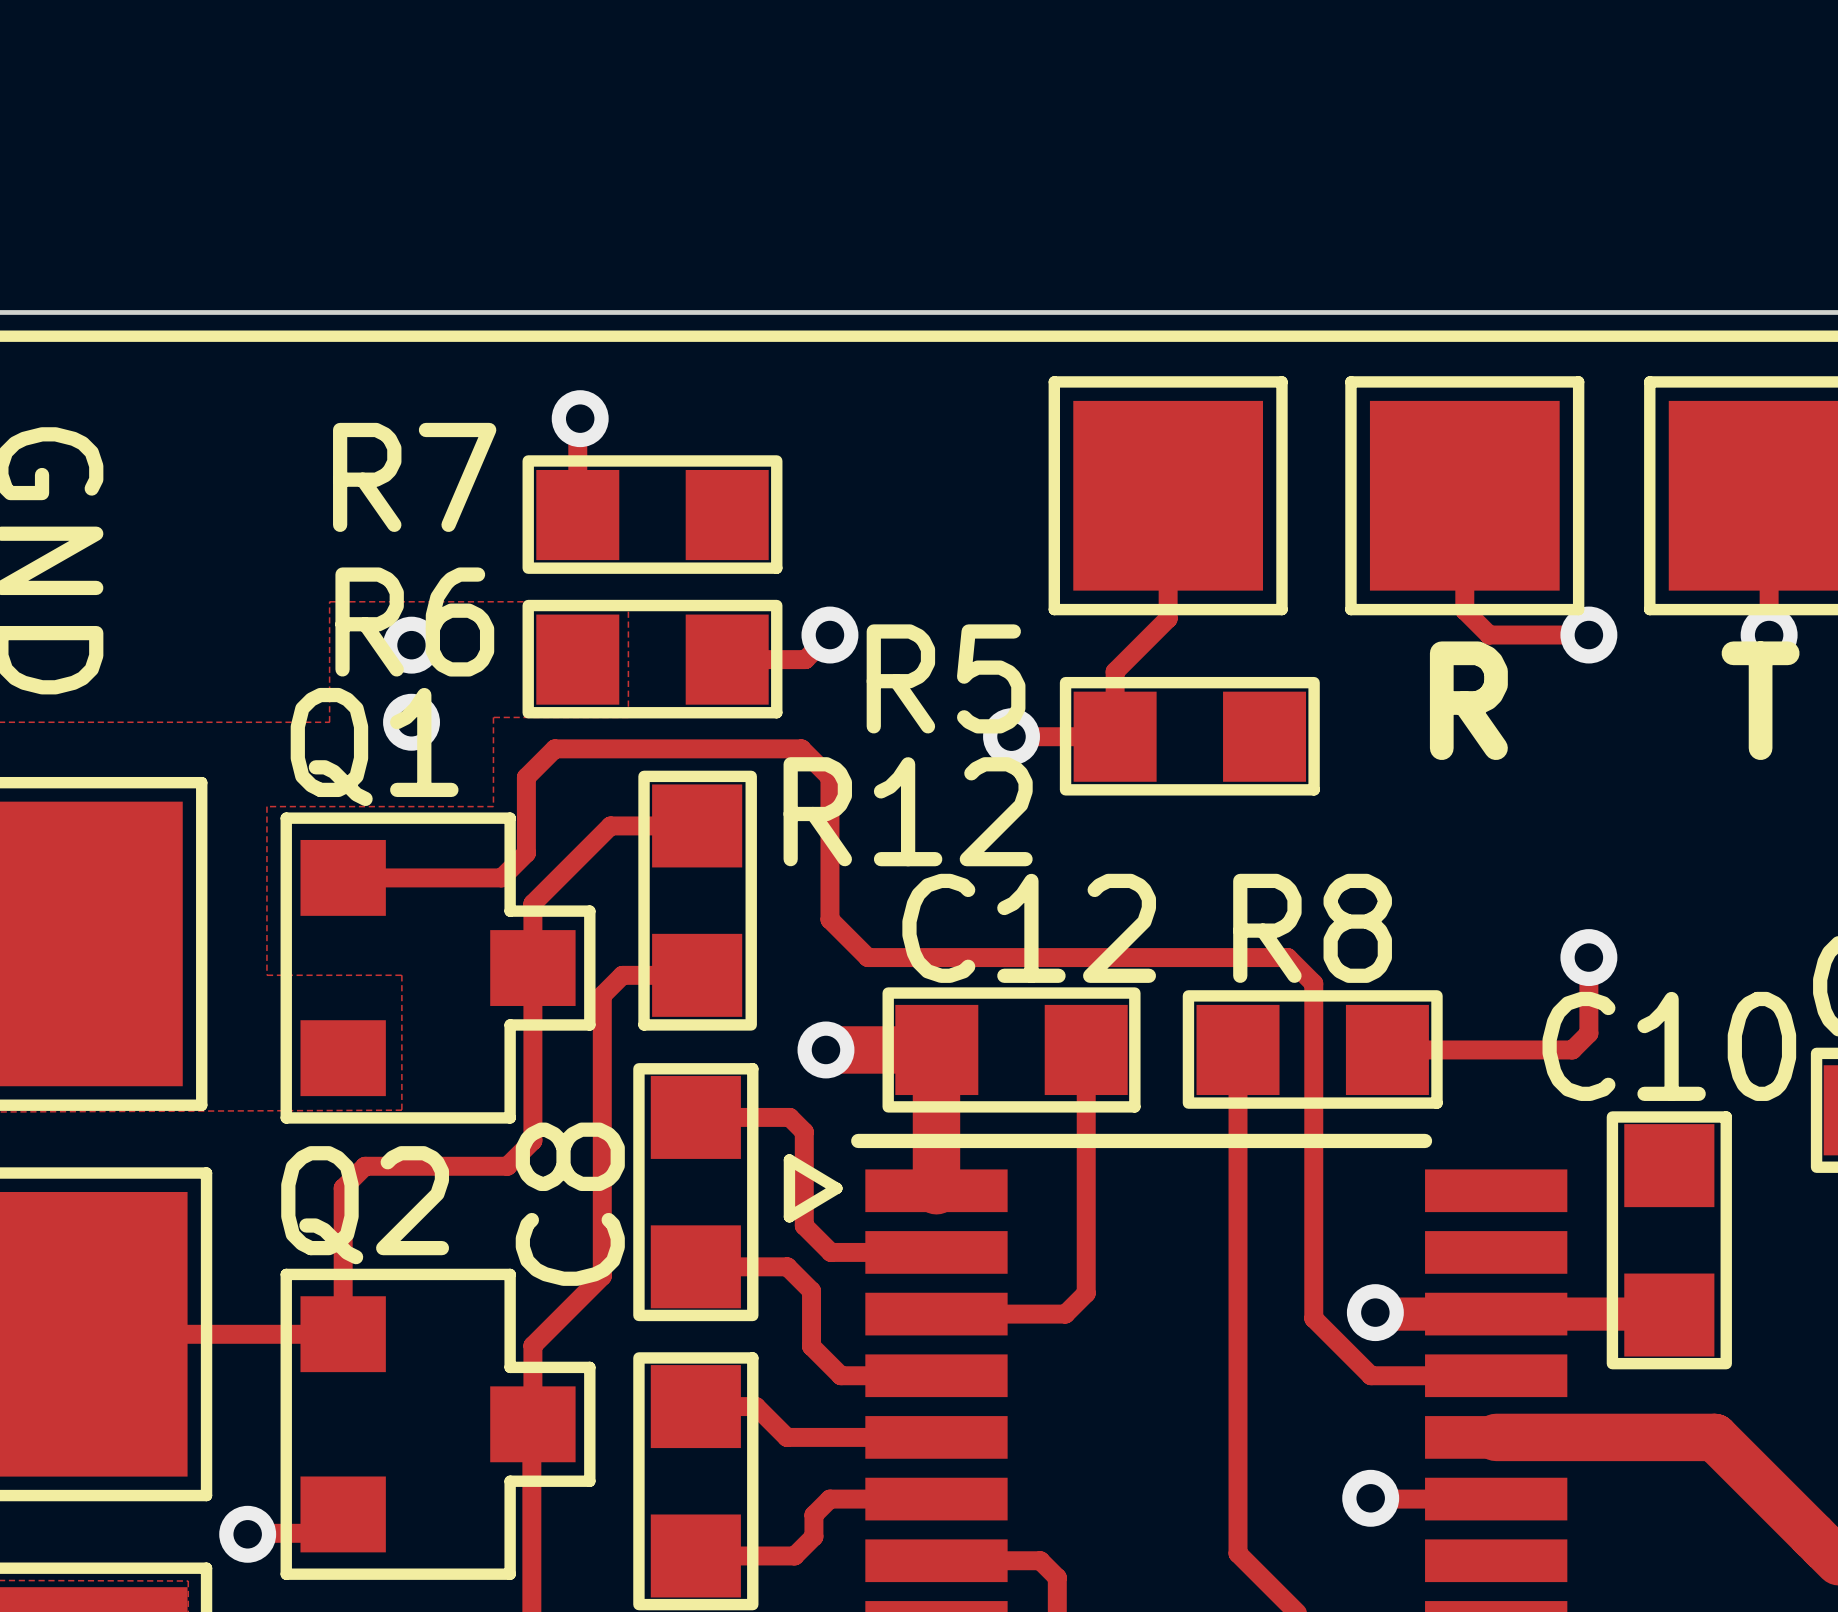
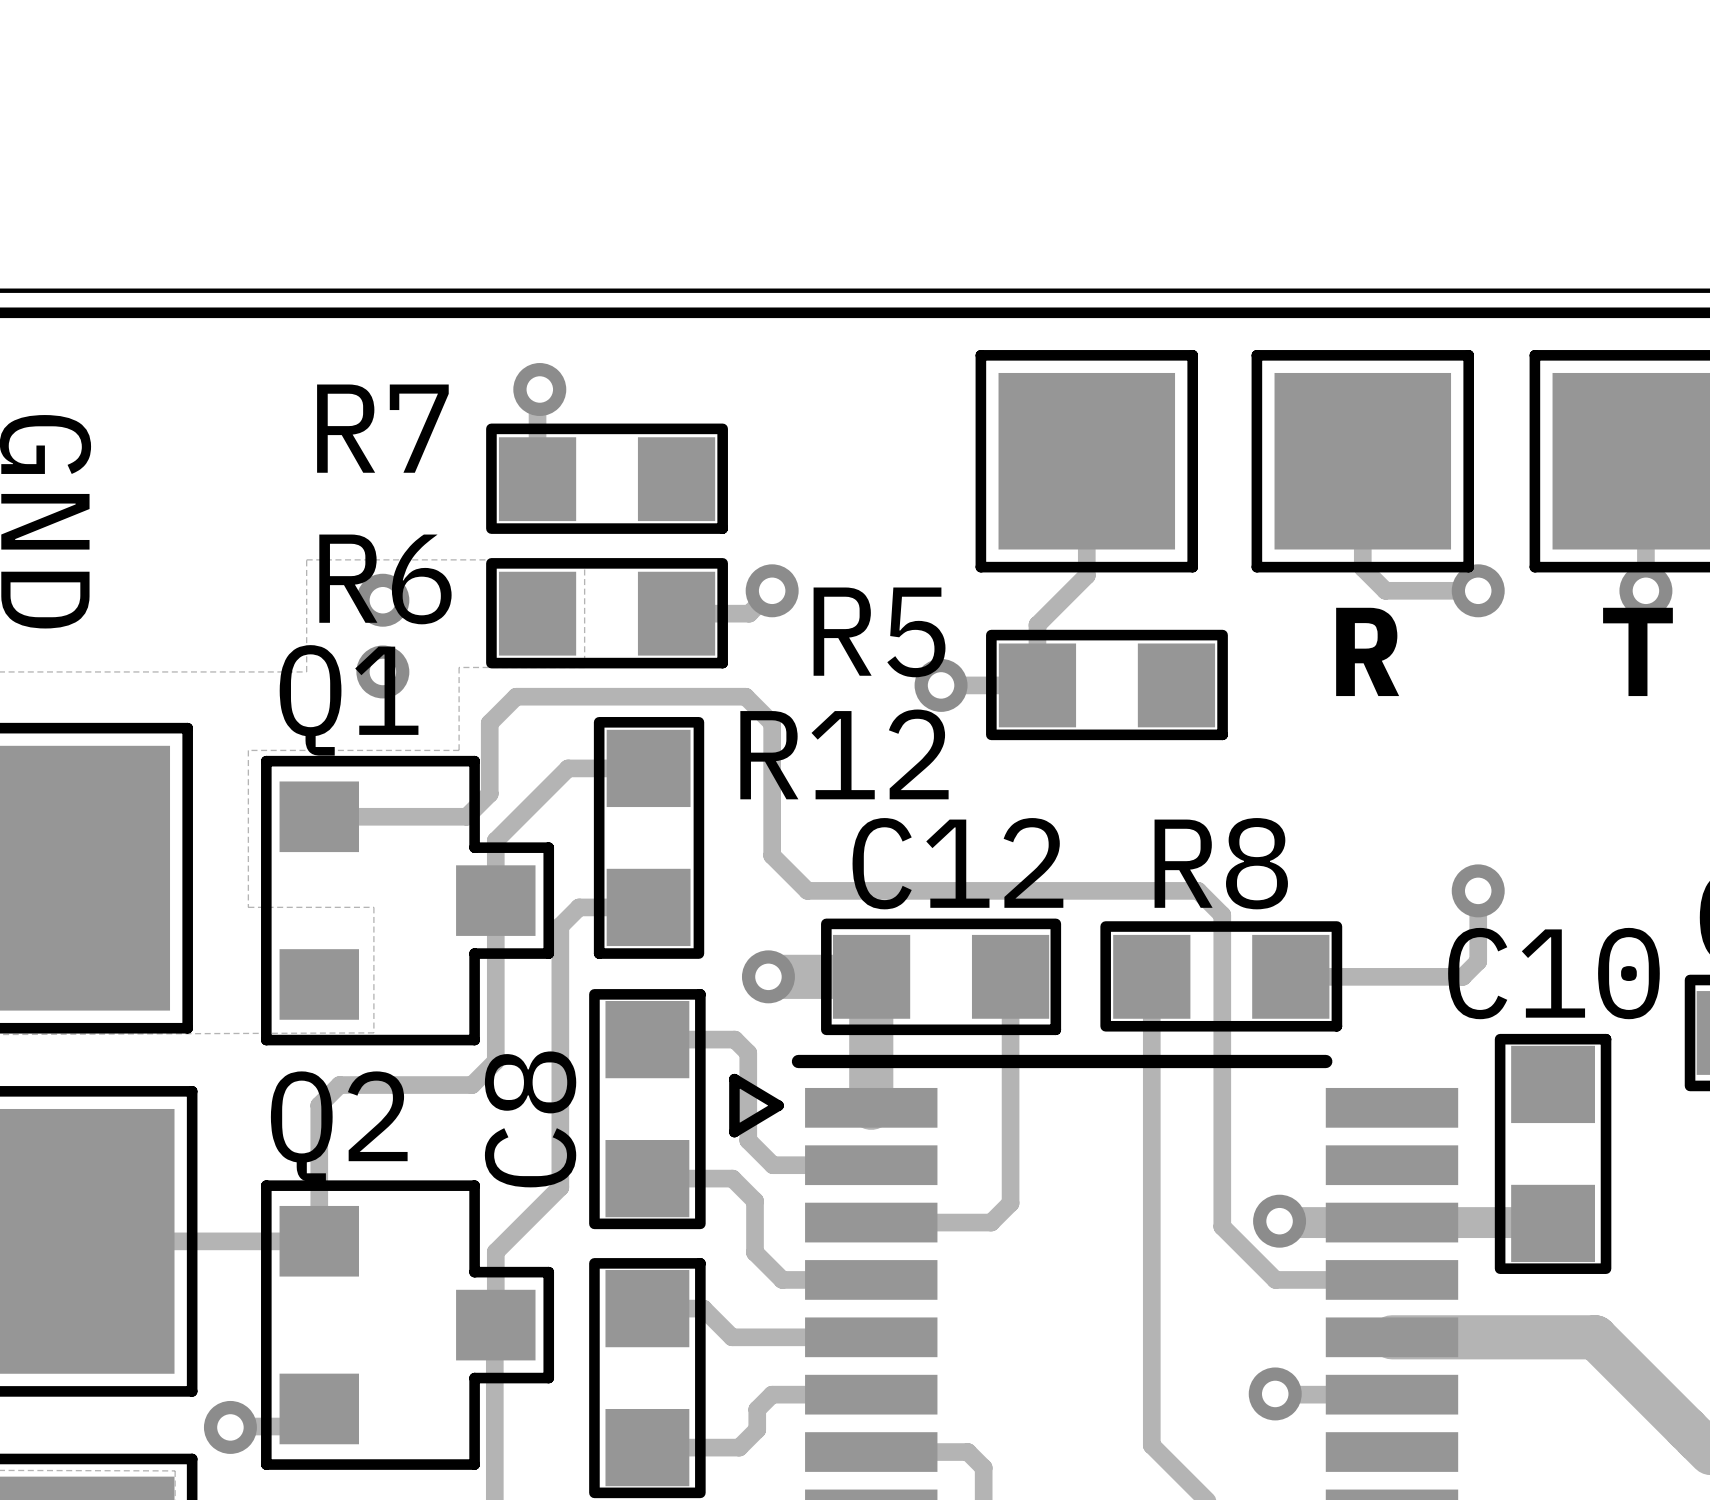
R7 name position: R7 (414, 477) -> R7 (382, 428)

